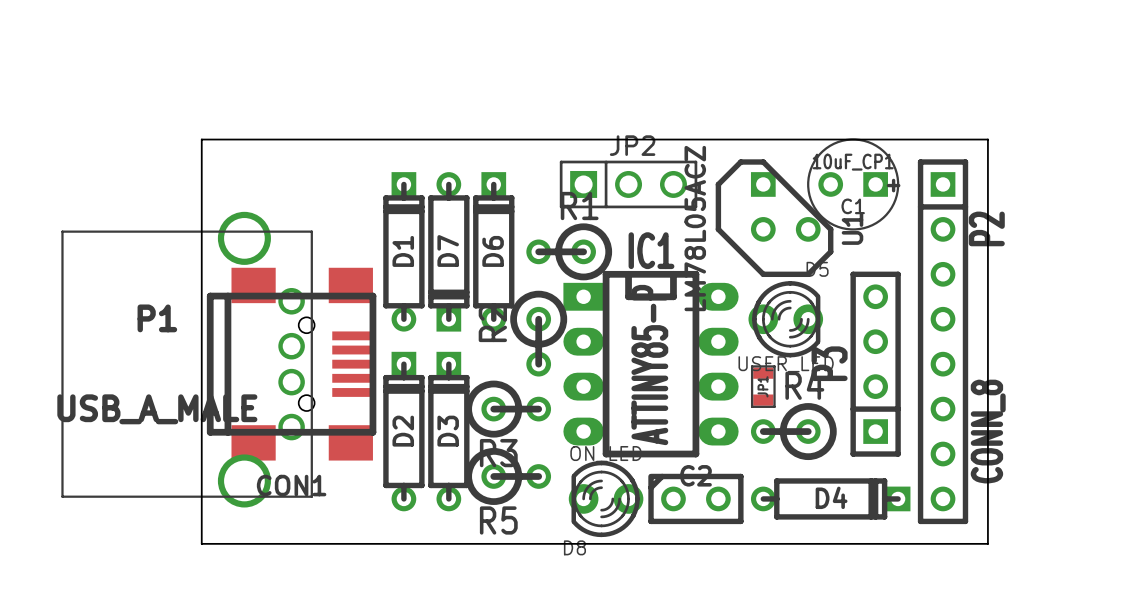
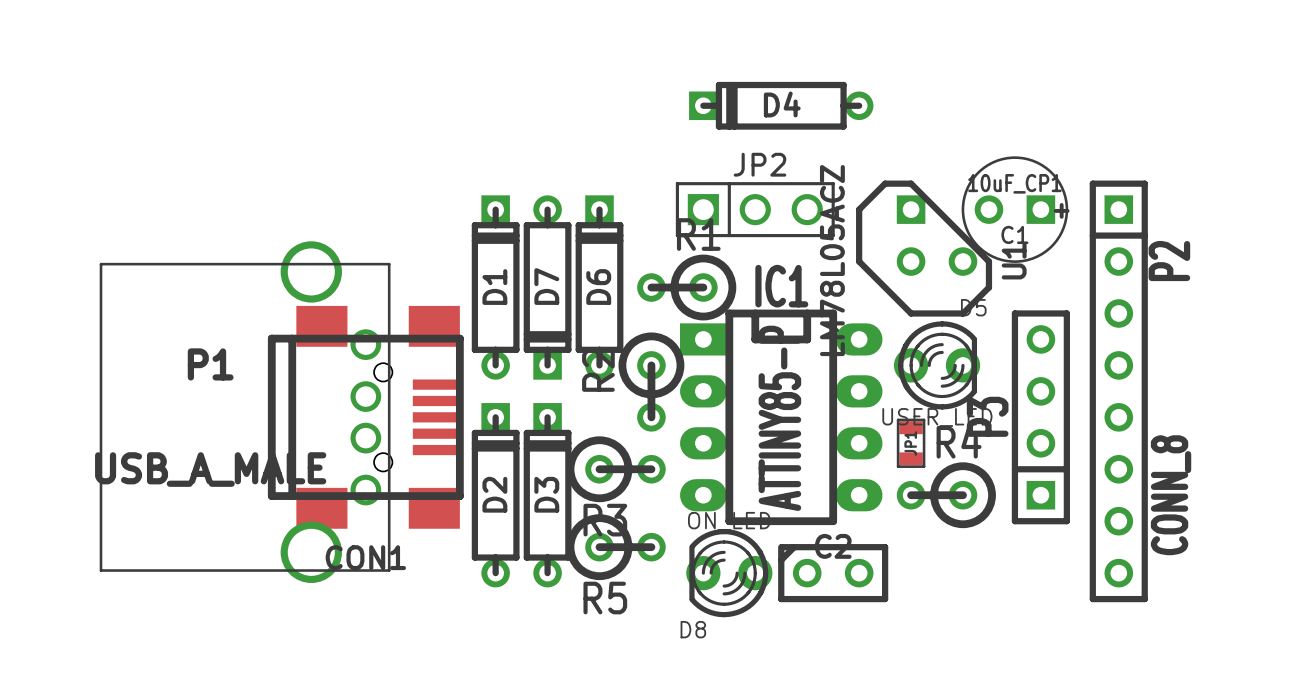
board edge: (201, 139) (987, 139) (987, 543) (201, 543) (201, 139) -> none
D4 rotation: 0° (830, 498) -> 180° (781, 105)
D4 position: (830, 498) -> (781, 105)

